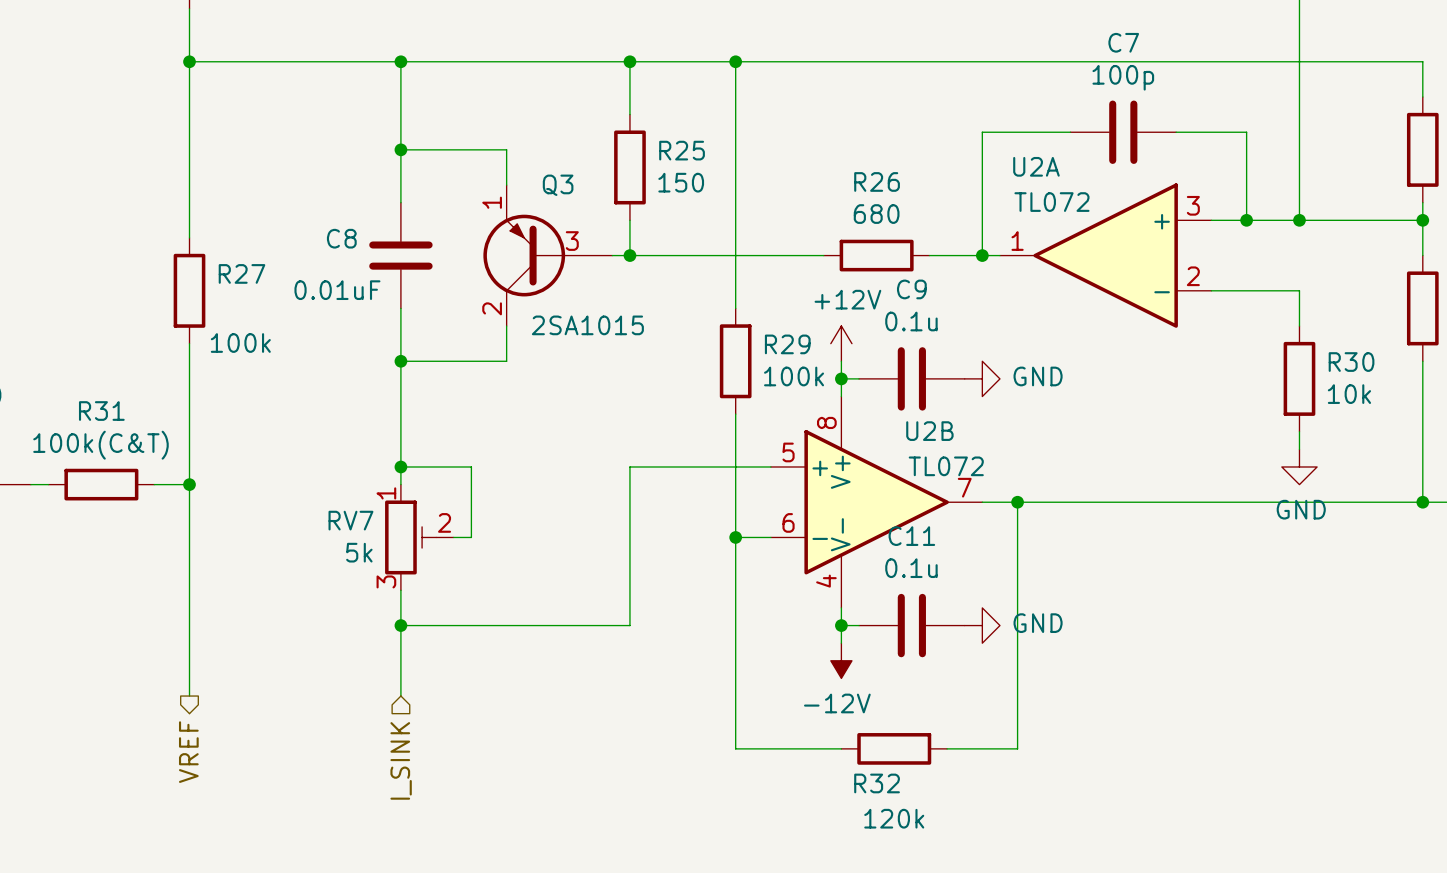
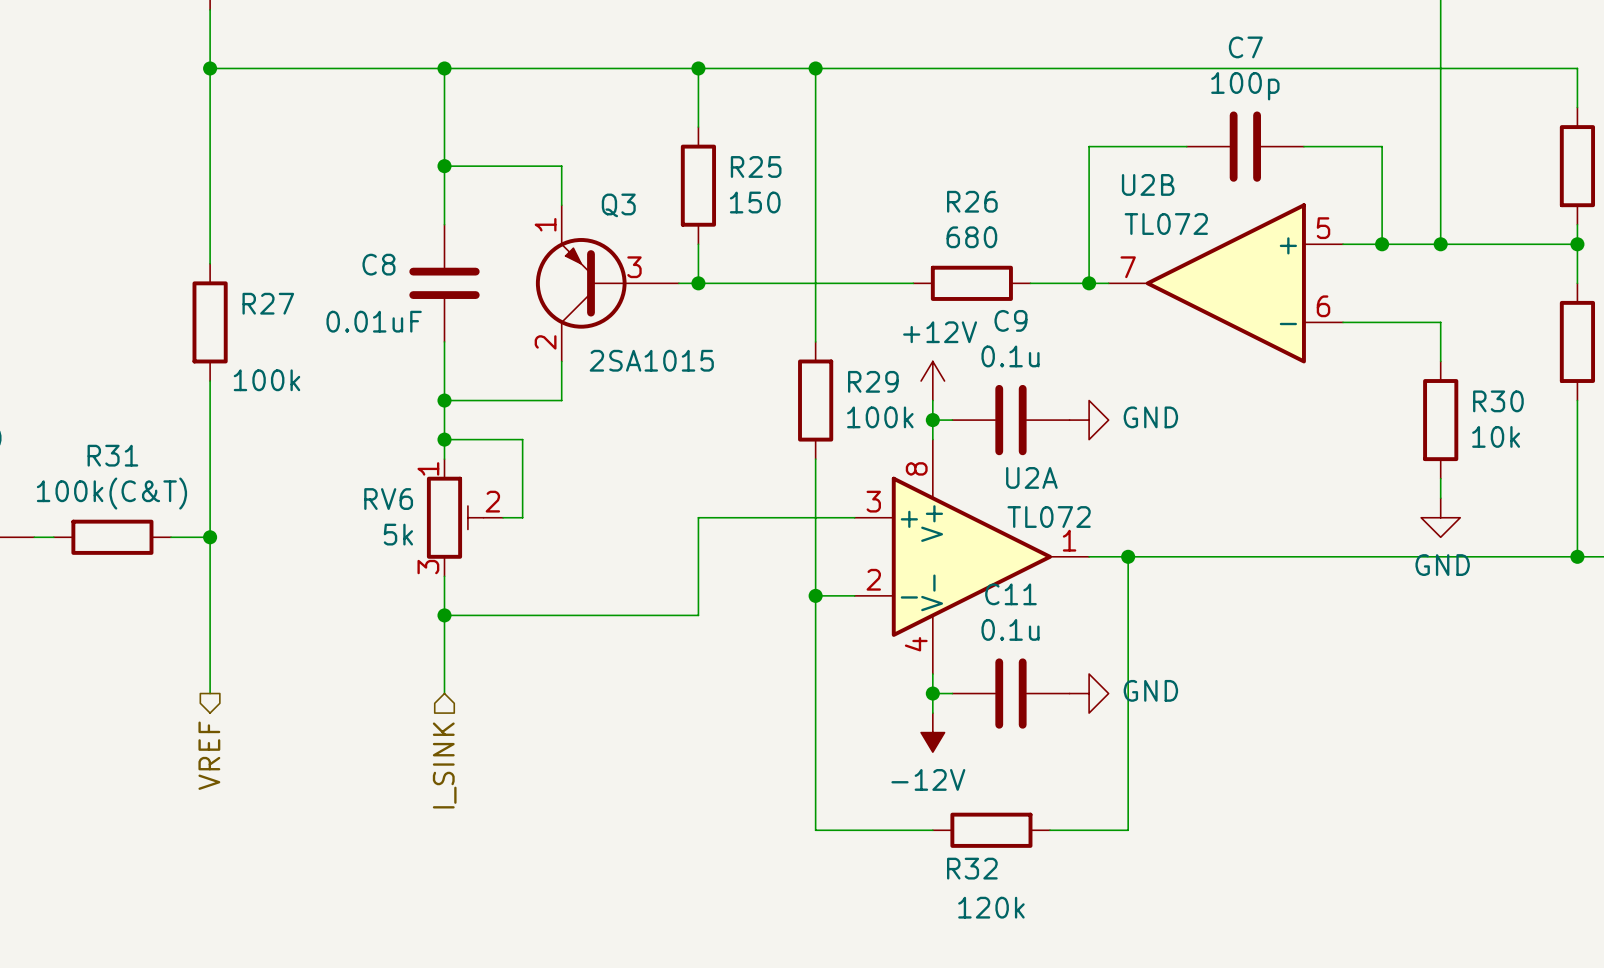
U2A flip: as is (1105, 255) -> left-right (971, 556)
U2A position: (1105, 255) -> (971, 556)
junction: none -> (444, 439)
wire: (400, 414) (400, 484) -> (444, 576) (444, 654)
junction: (400, 466) -> none
RV6: none -> 5k (465, 517)
wire: (471, 466) (471, 537) (453, 537) -> (522, 517) (522, 439) (444, 439)
U2B flip: as is (876, 502) -> left-right (1225, 283)
U2B position: (876, 502) -> (1225, 283)
RV7: 5k (419, 537) -> none
junction: none -> (444, 615)
wire: (629, 555) (629, 625) (400, 625) (400, 696) -> (698, 615) (444, 615)
wire: (189, 625) (189, 696) -> none
junction: (400, 625) -> none
hierarchical label position: VREF (188, 752) -> VREF (209, 755)
hierarchical label position: I_SINK (401, 760) -> I_SINK (444, 765)

